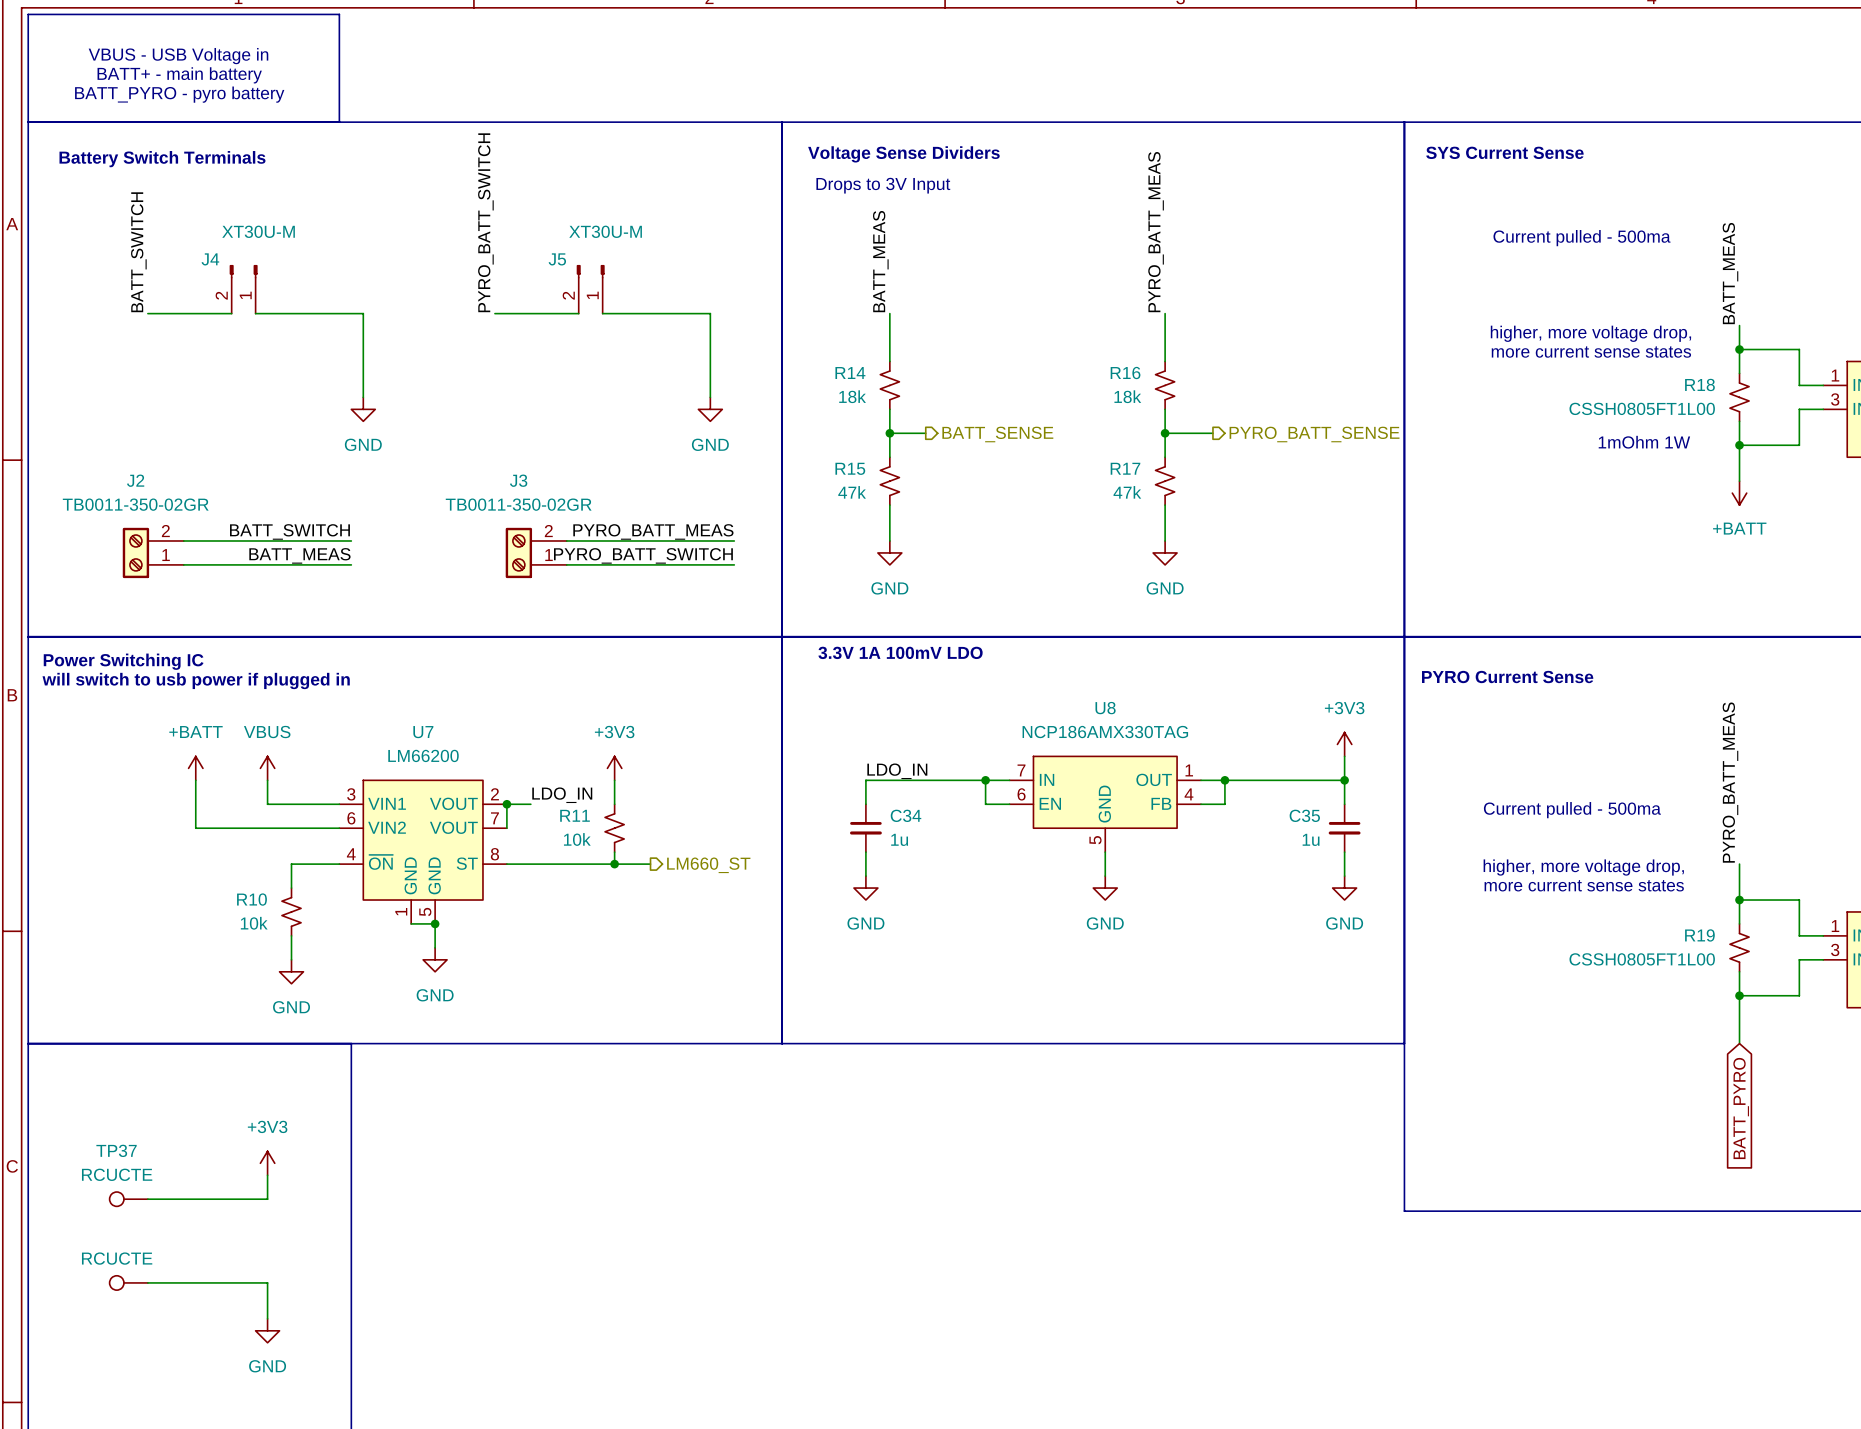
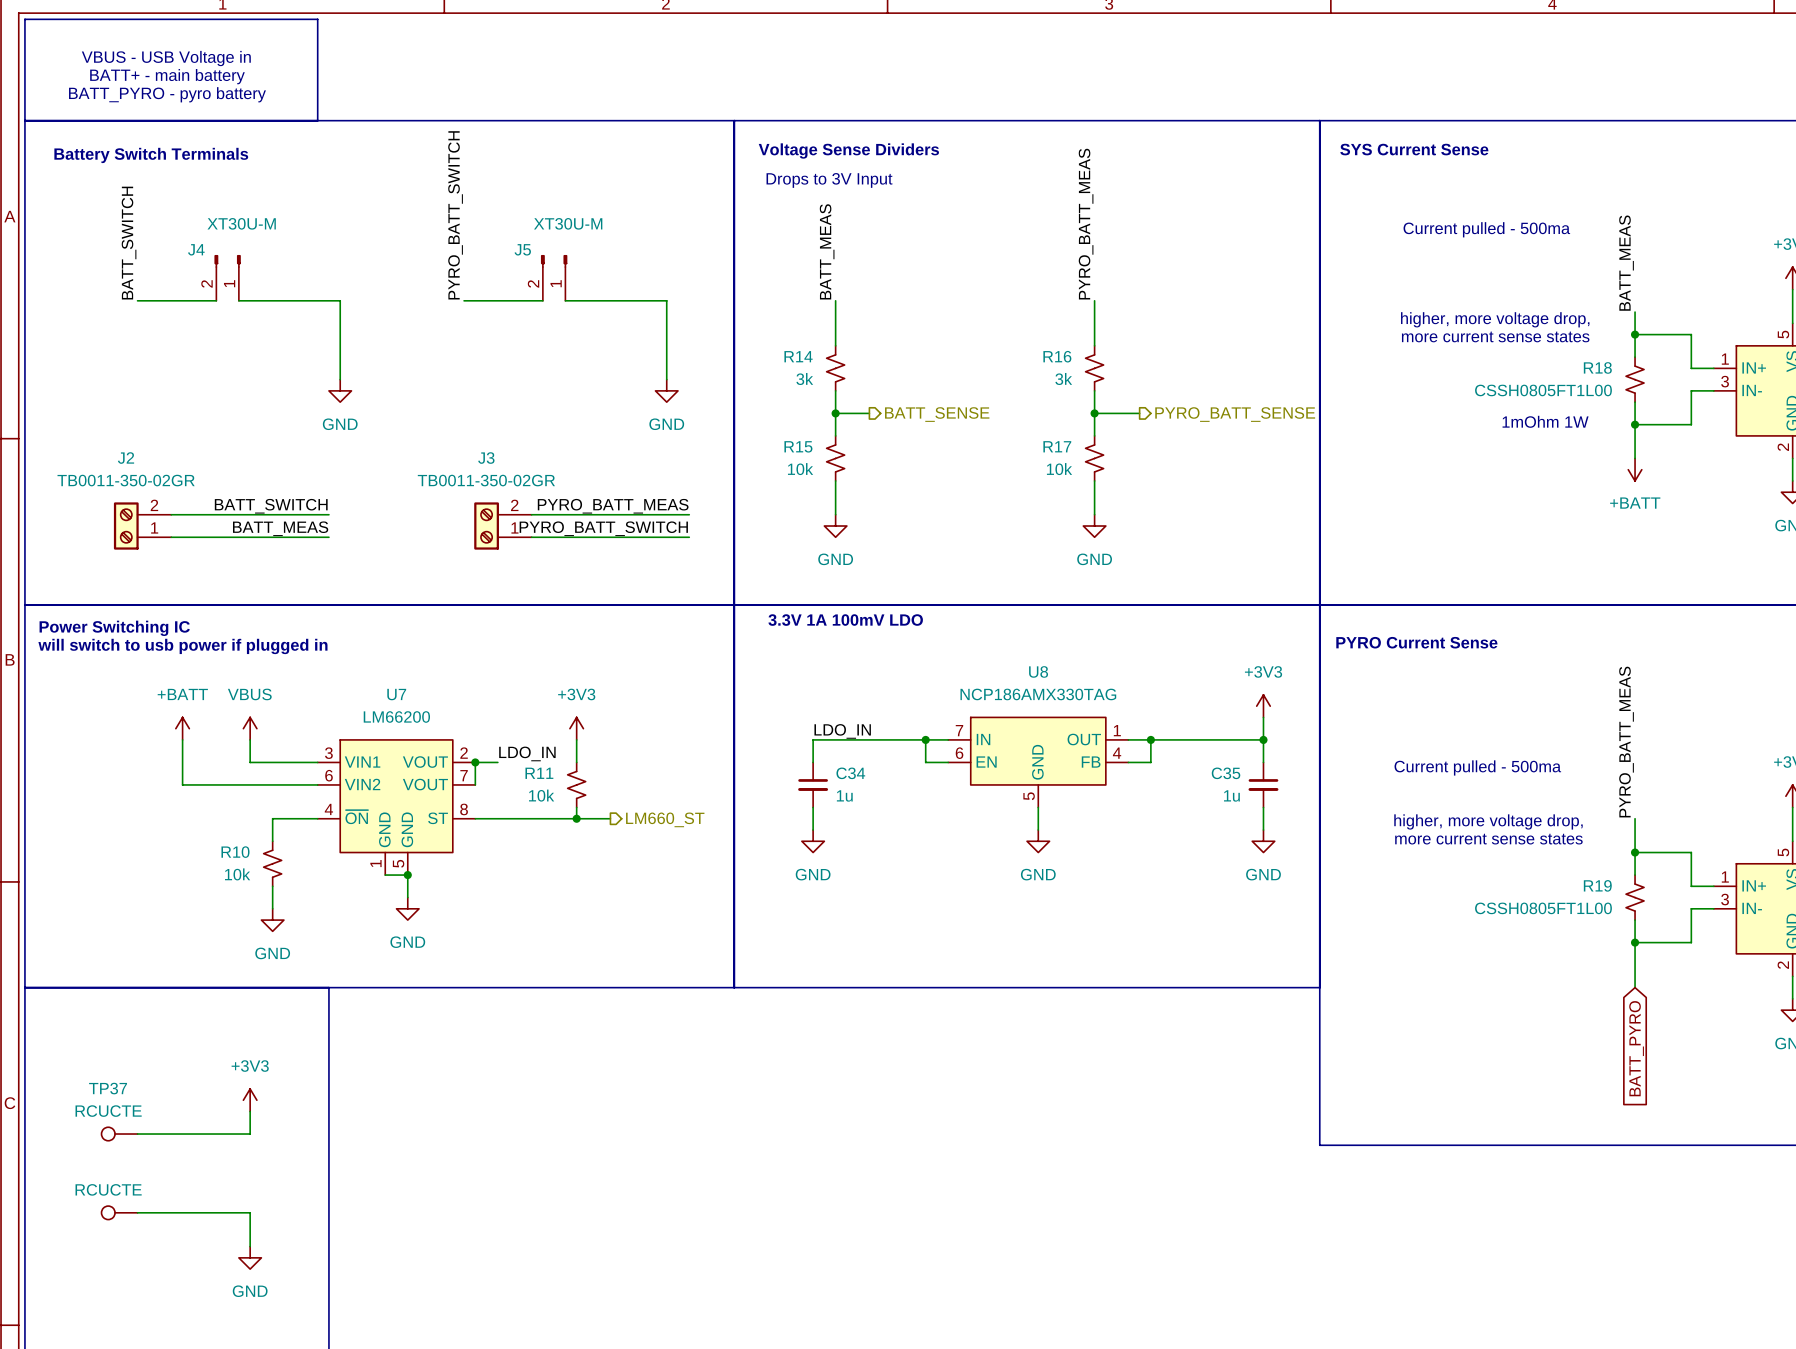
R14 value: 18k (852, 396) -> 3k (804, 378)
R16 value: 18k (1127, 396) -> 3k (1063, 378)
R15 value: 47k (852, 492) -> 10k (800, 469)
R17 value: 47k (1127, 492) -> 10k (1059, 469)

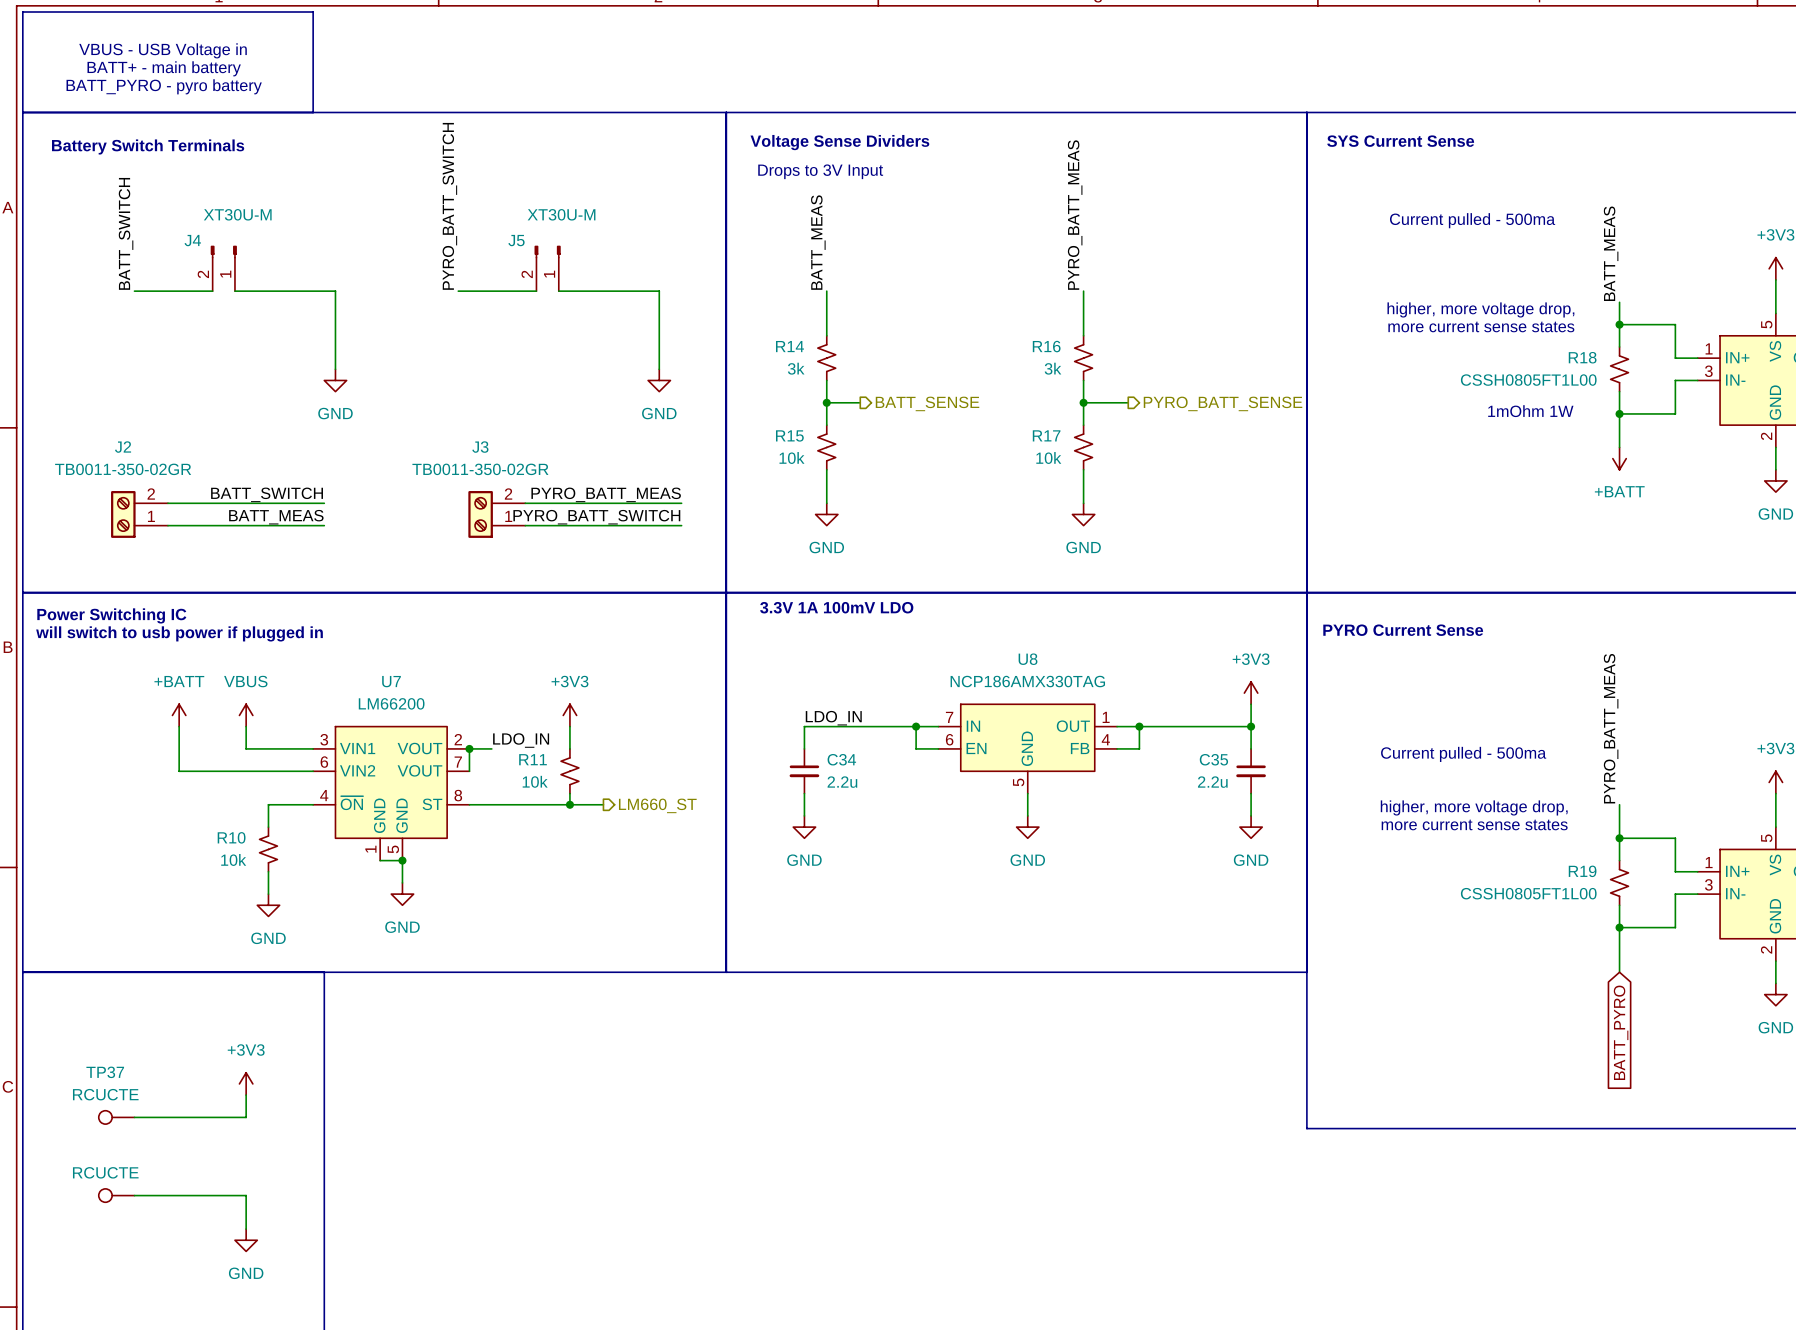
C34 value: 1u (844, 795) -> 2.2u (842, 782)
C35 value: 1u (1231, 795) -> 2.2u (1212, 782)

